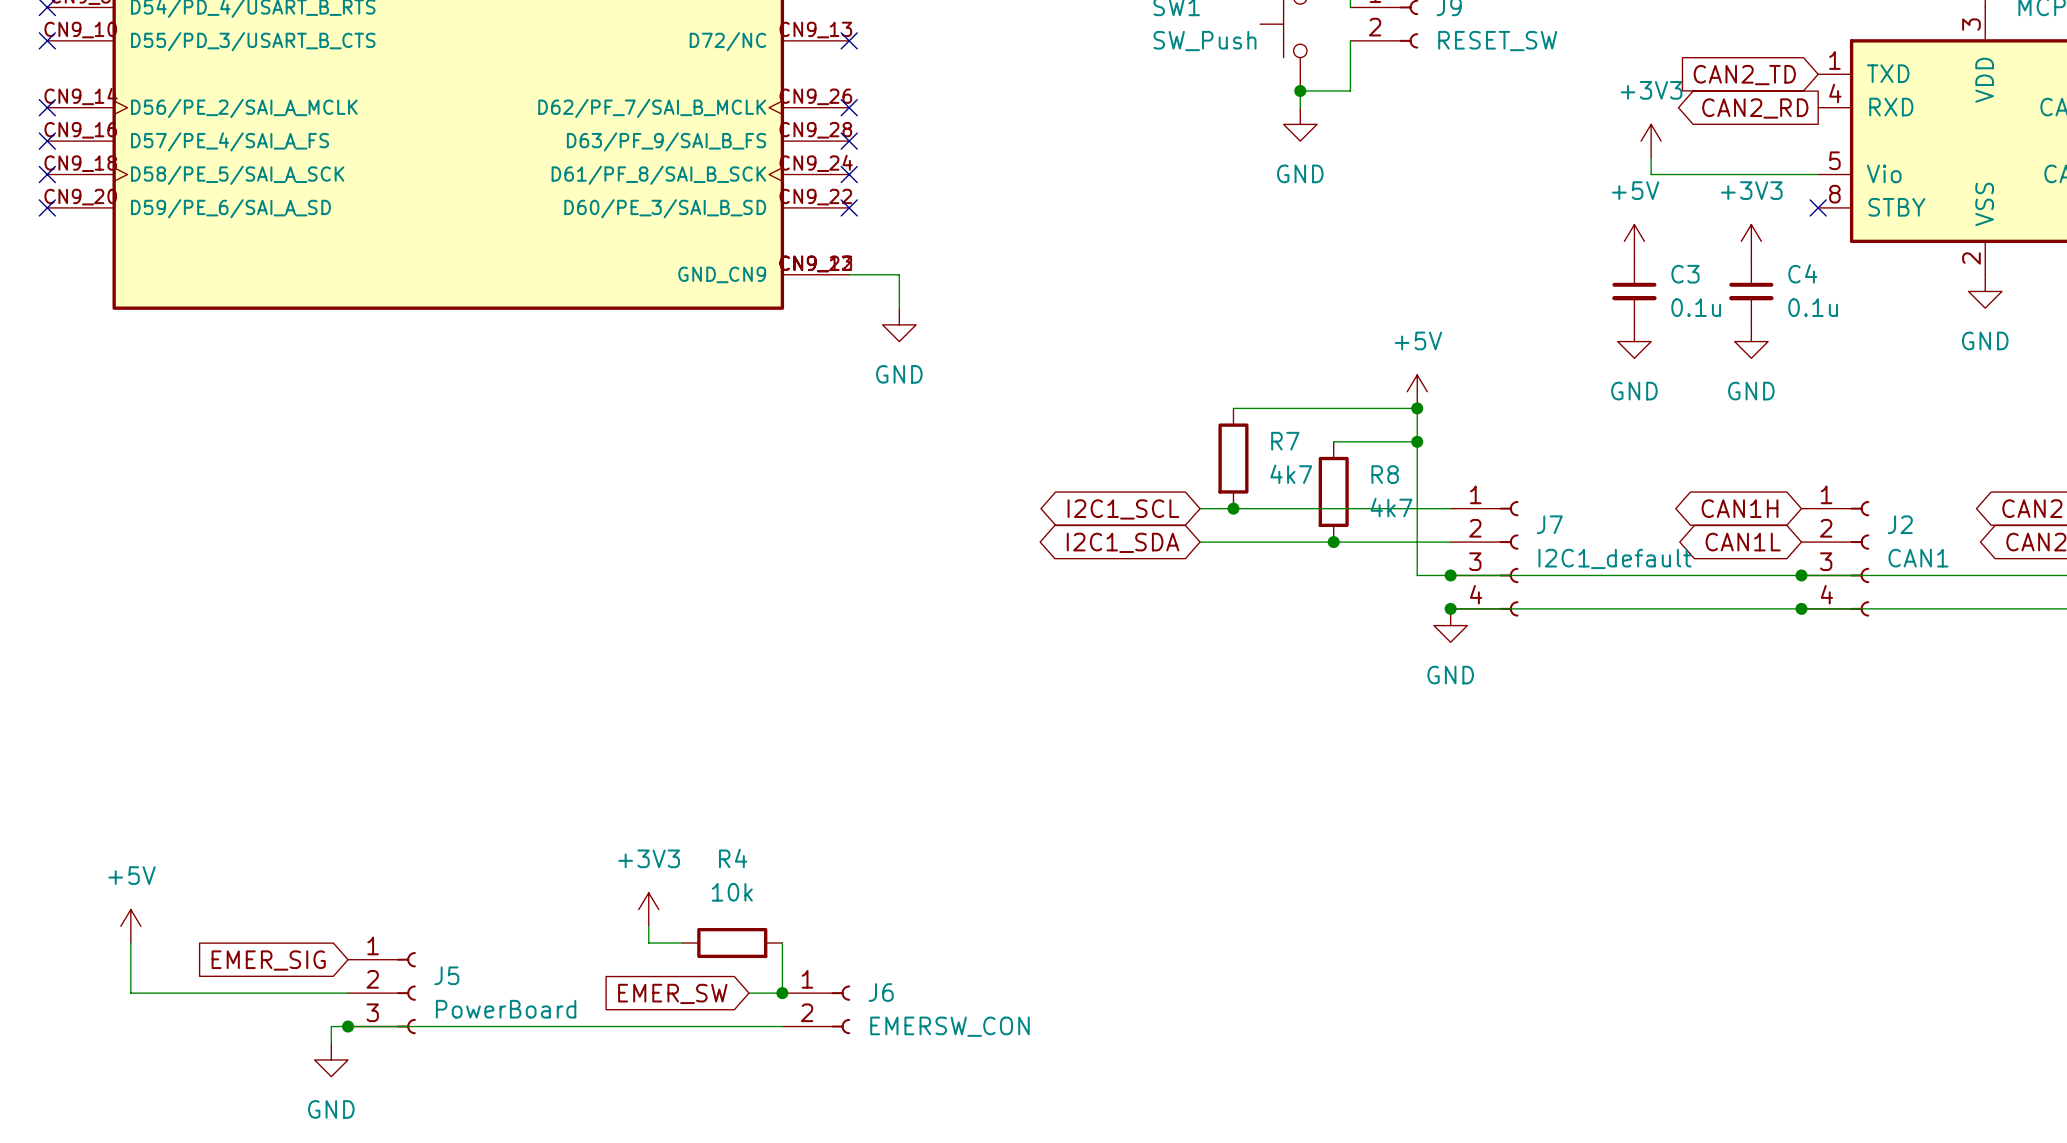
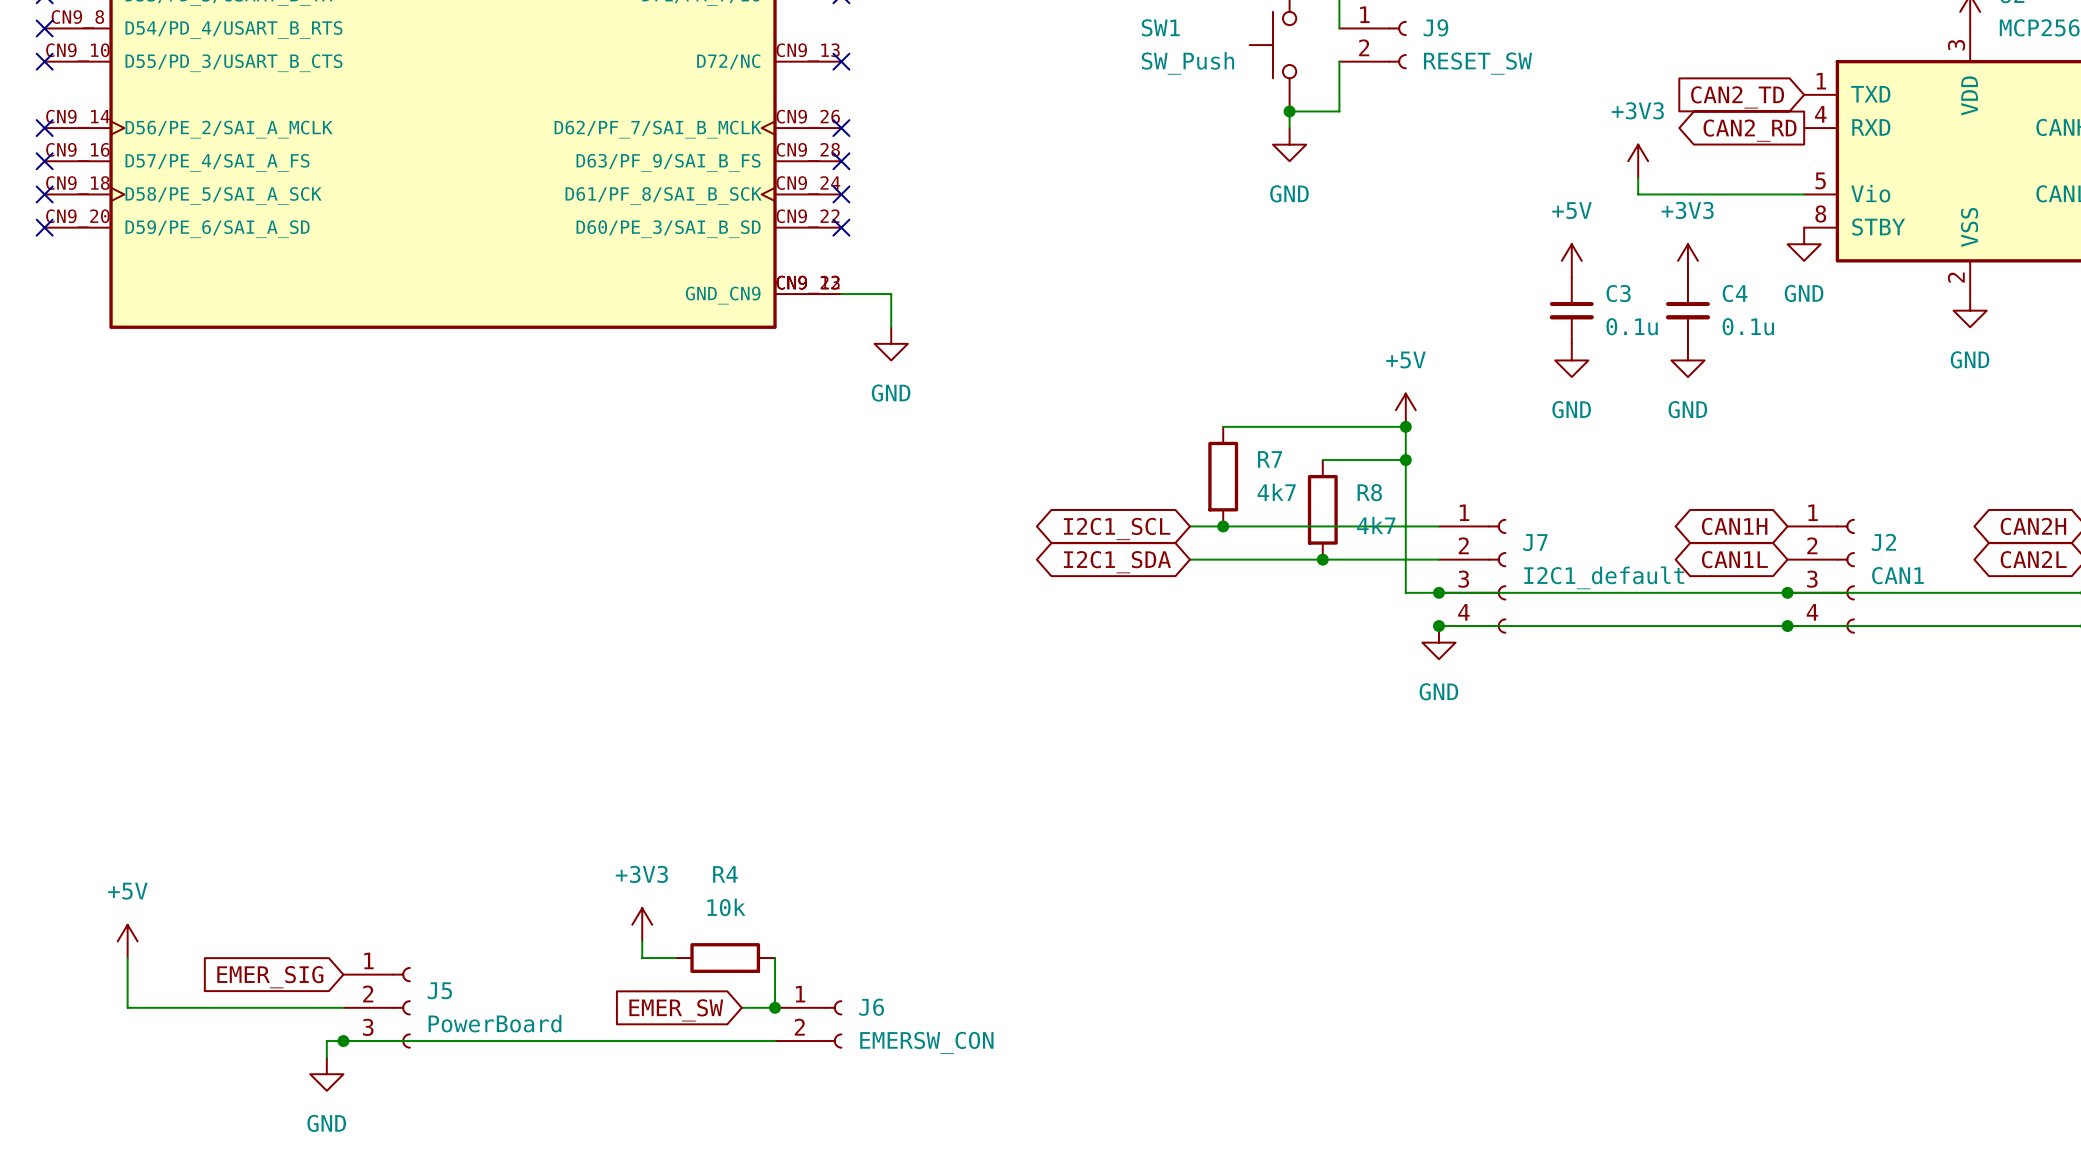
no-connect mark: (1818, 207) -> none
power symbol: none -> GND (1804, 244)
power symbol position: +5V (1634, 241) -> +5V (1571, 260)
power symbol position: +3V3 (1751, 241) -> +3V3 (1687, 260)
C3 position: (1634, 291) -> (1571, 310)
C4 position: (1751, 291) -> (1687, 310)
power symbol: none -> GND (1571, 360)
power symbol: GND (1634, 341) -> none
power symbol: none -> GND (1687, 360)
power symbol: GND (1751, 341) -> none

